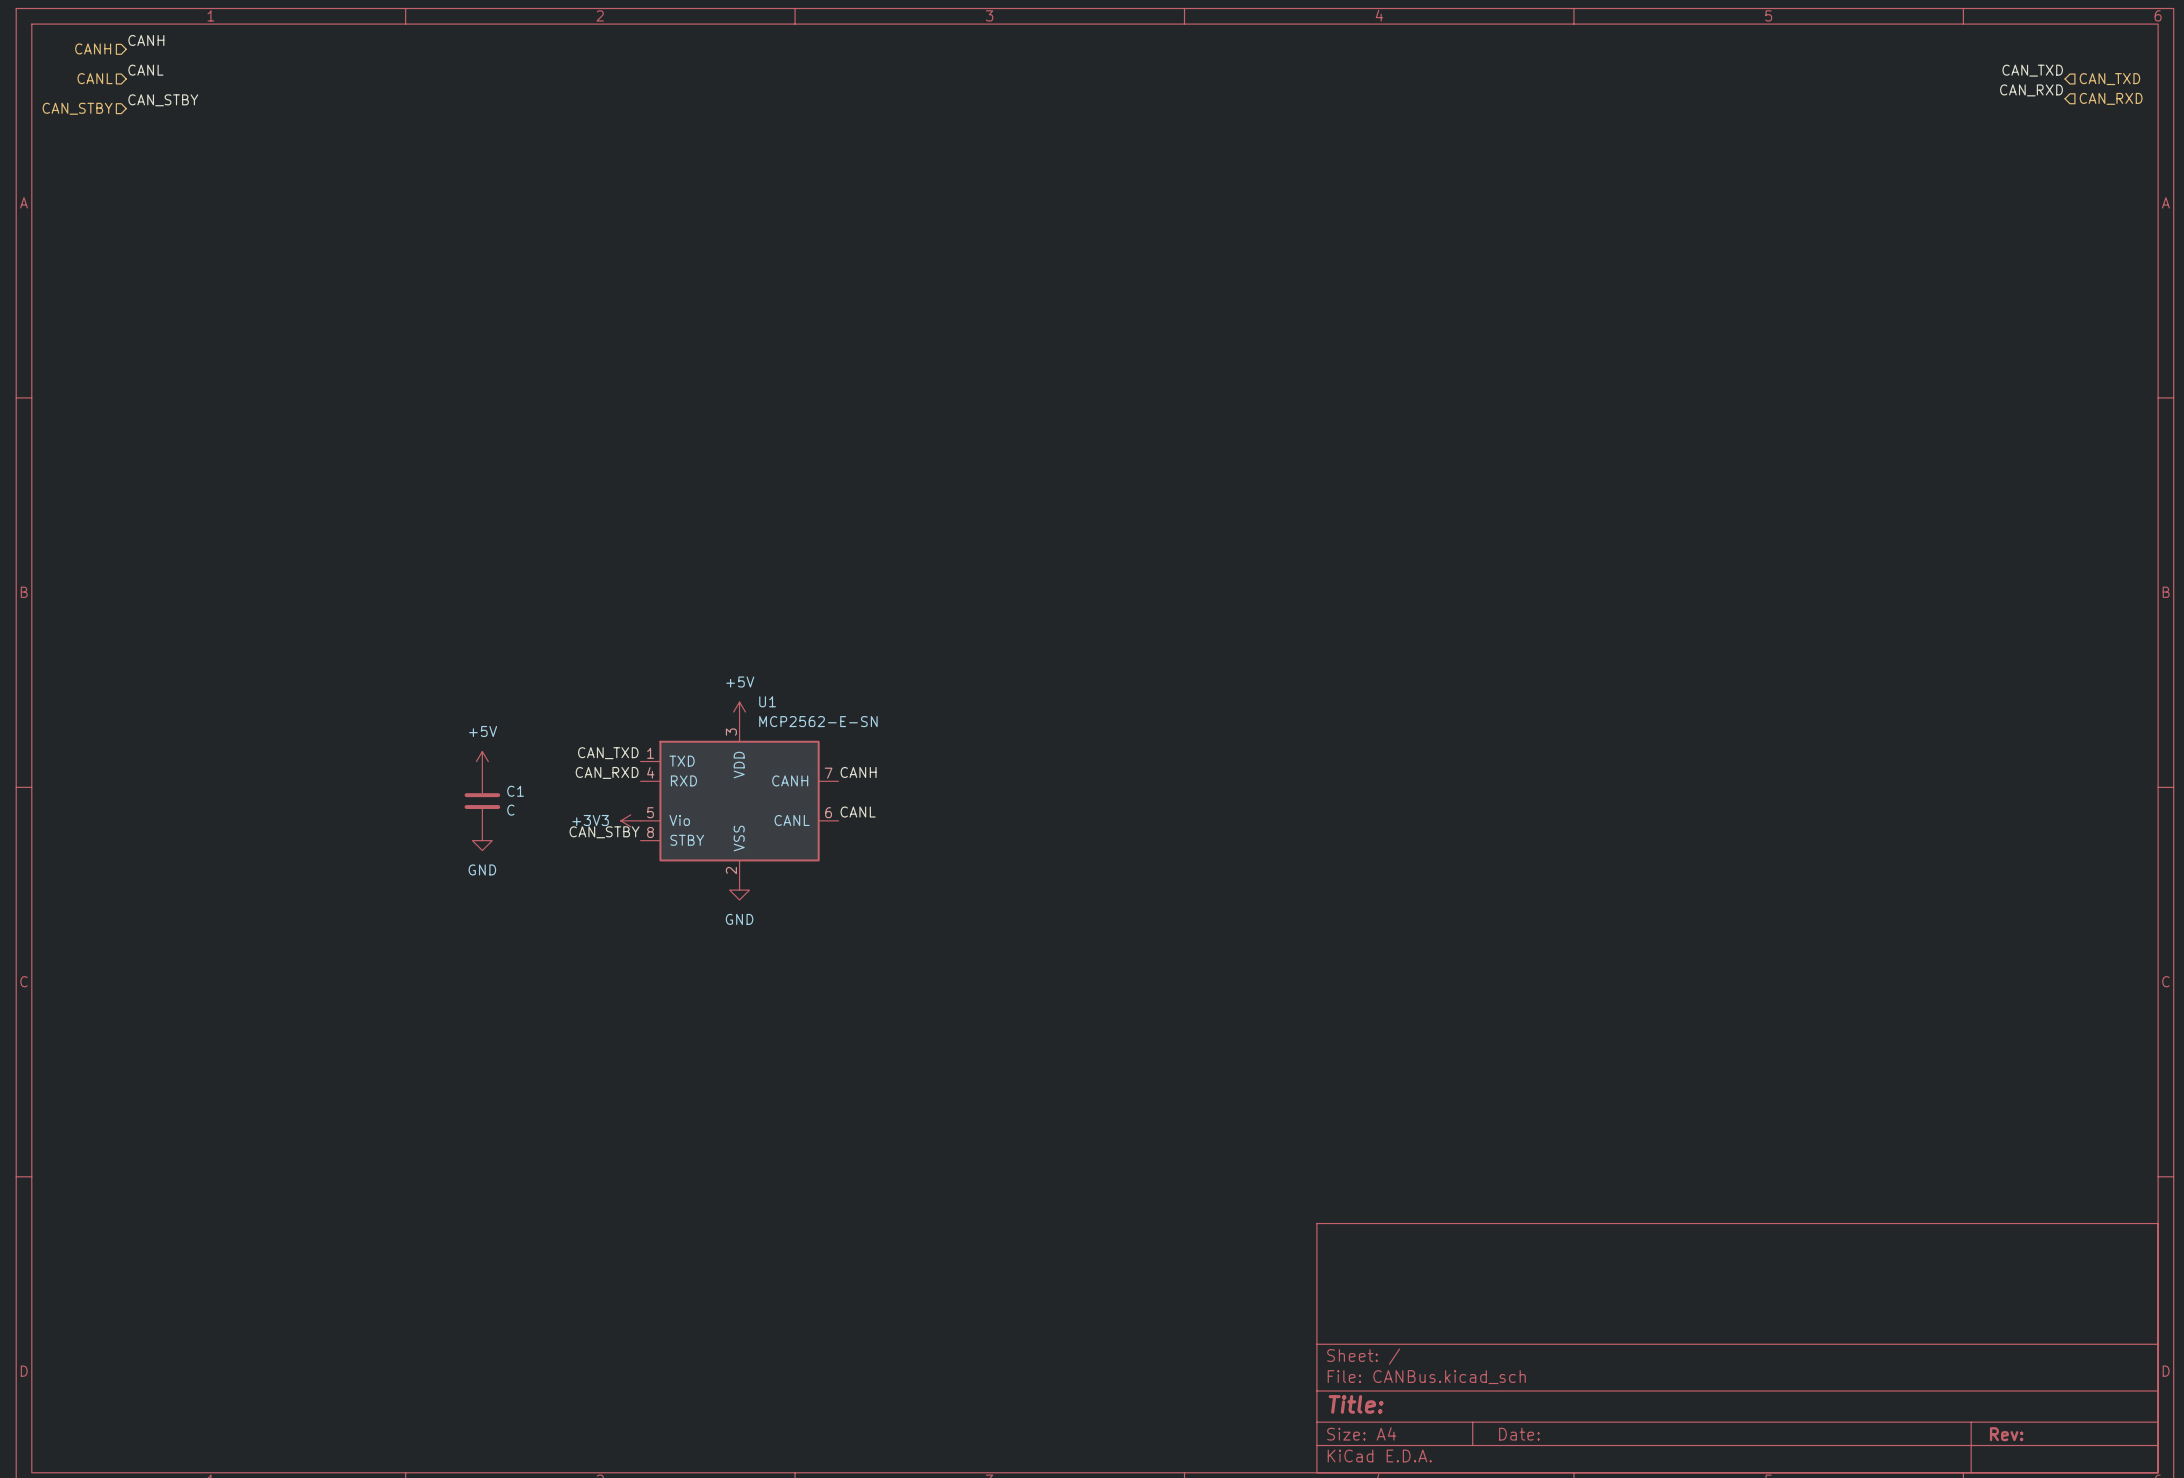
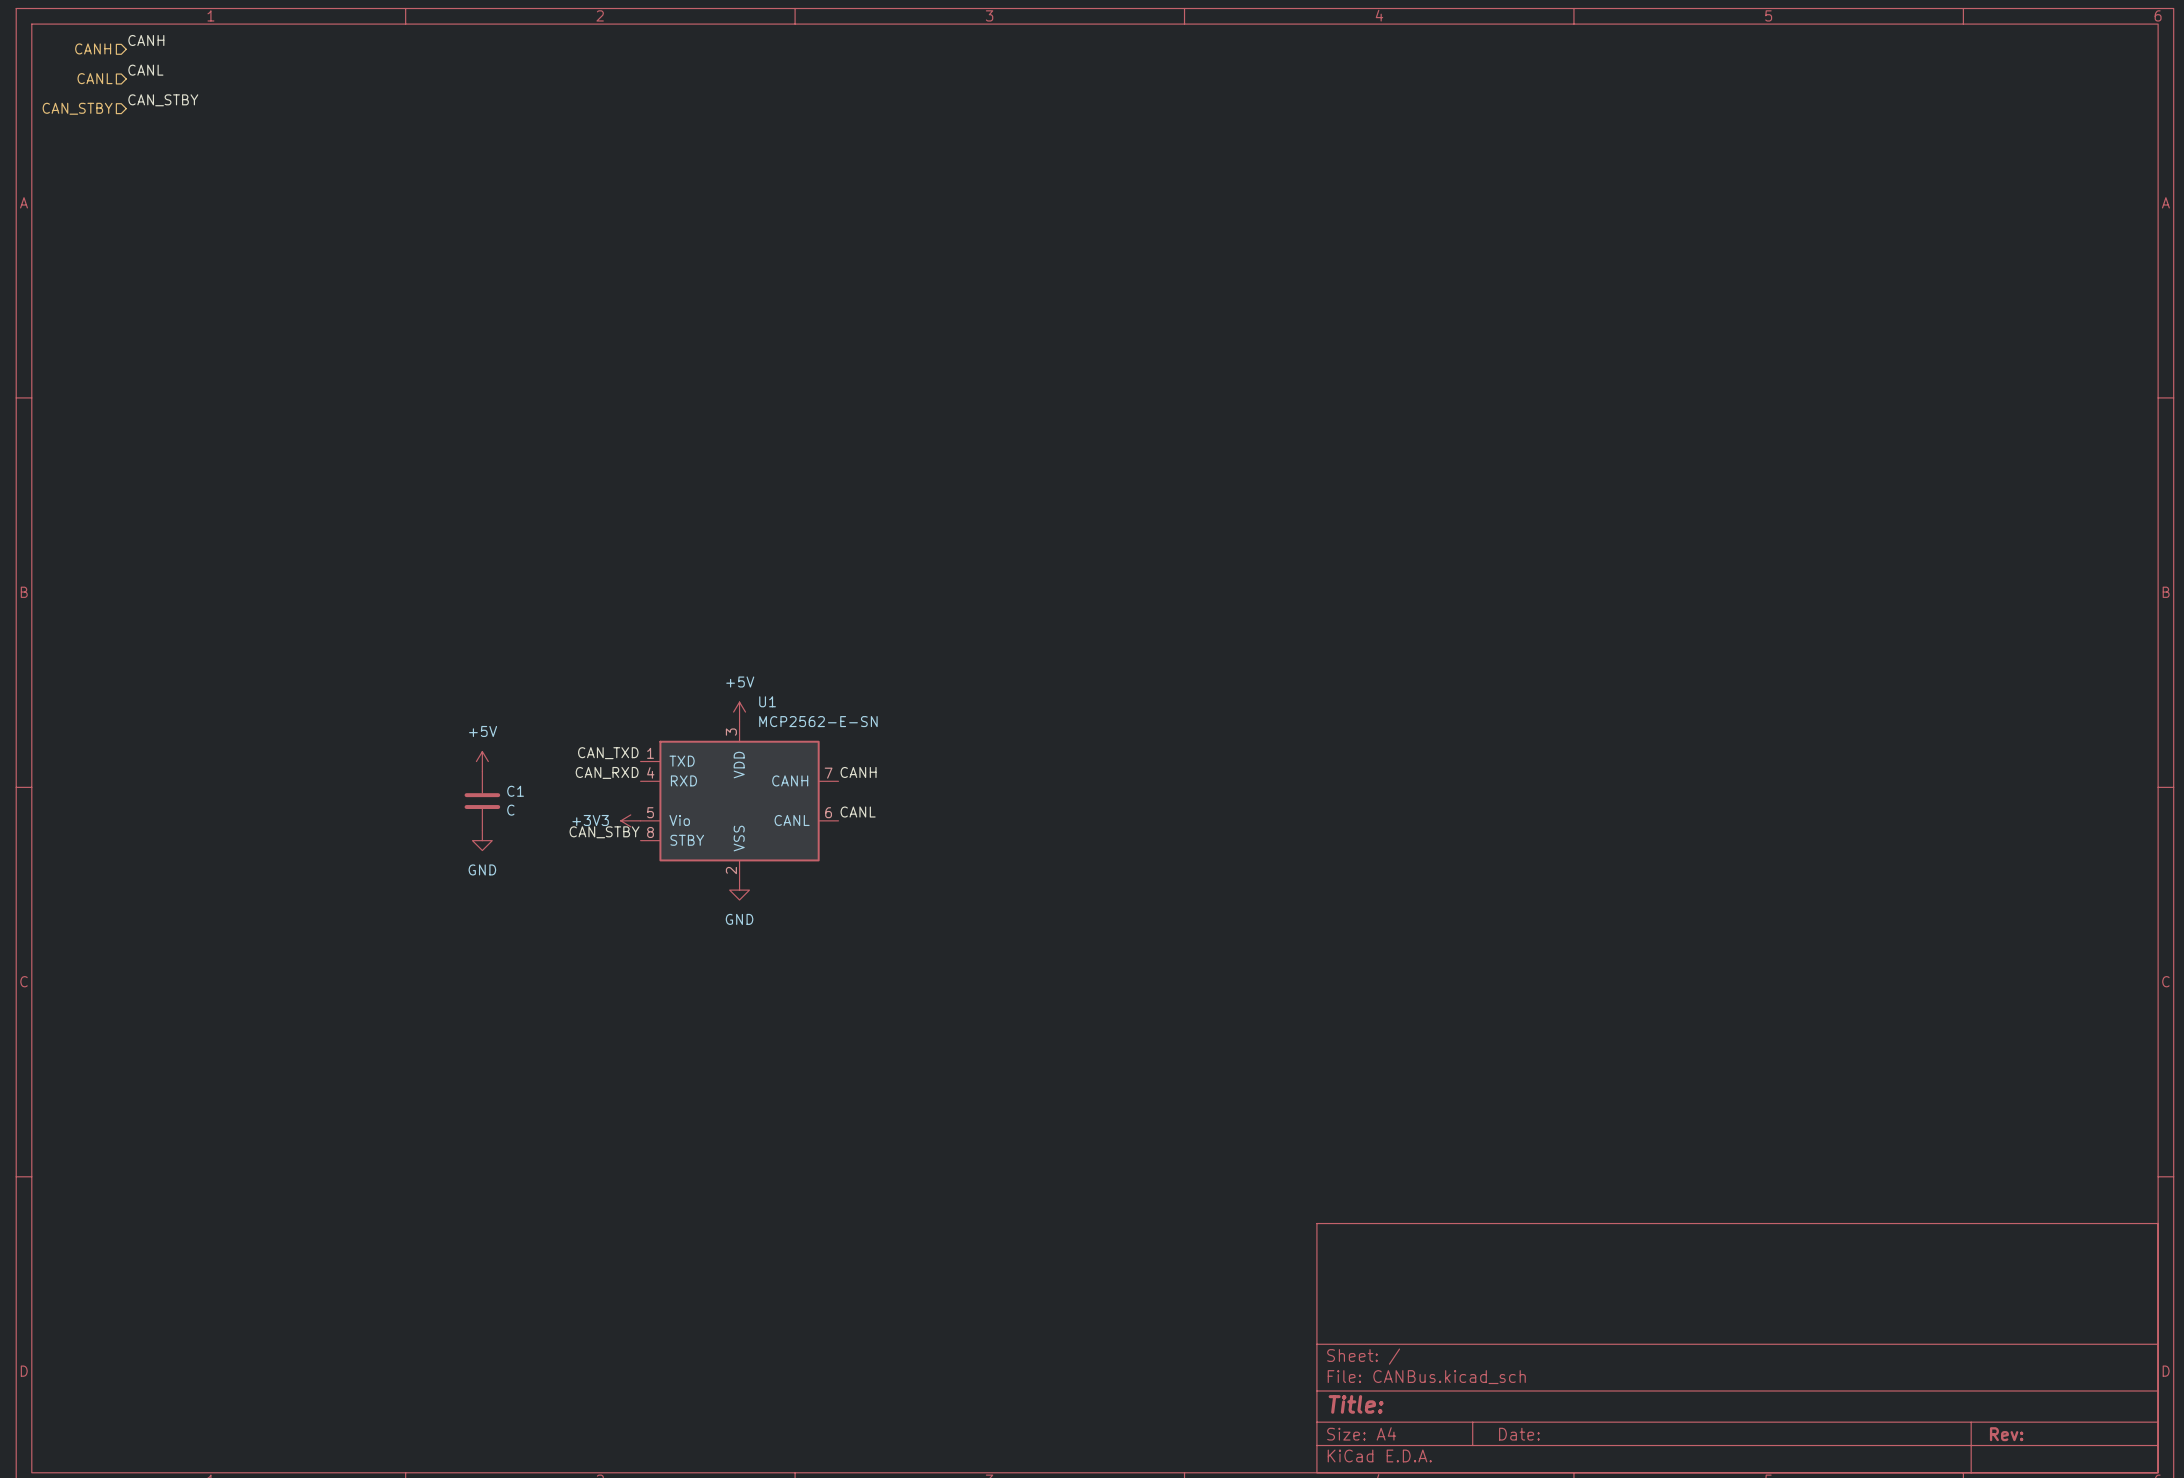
label: CAN_TXD (2032, 70) -> none
hierarchical label: CAN_TXD (2109, 79) -> none
label: CAN_RXD (2031, 90) -> none
hierarchical label: CAN_RXD (2111, 98) -> none

